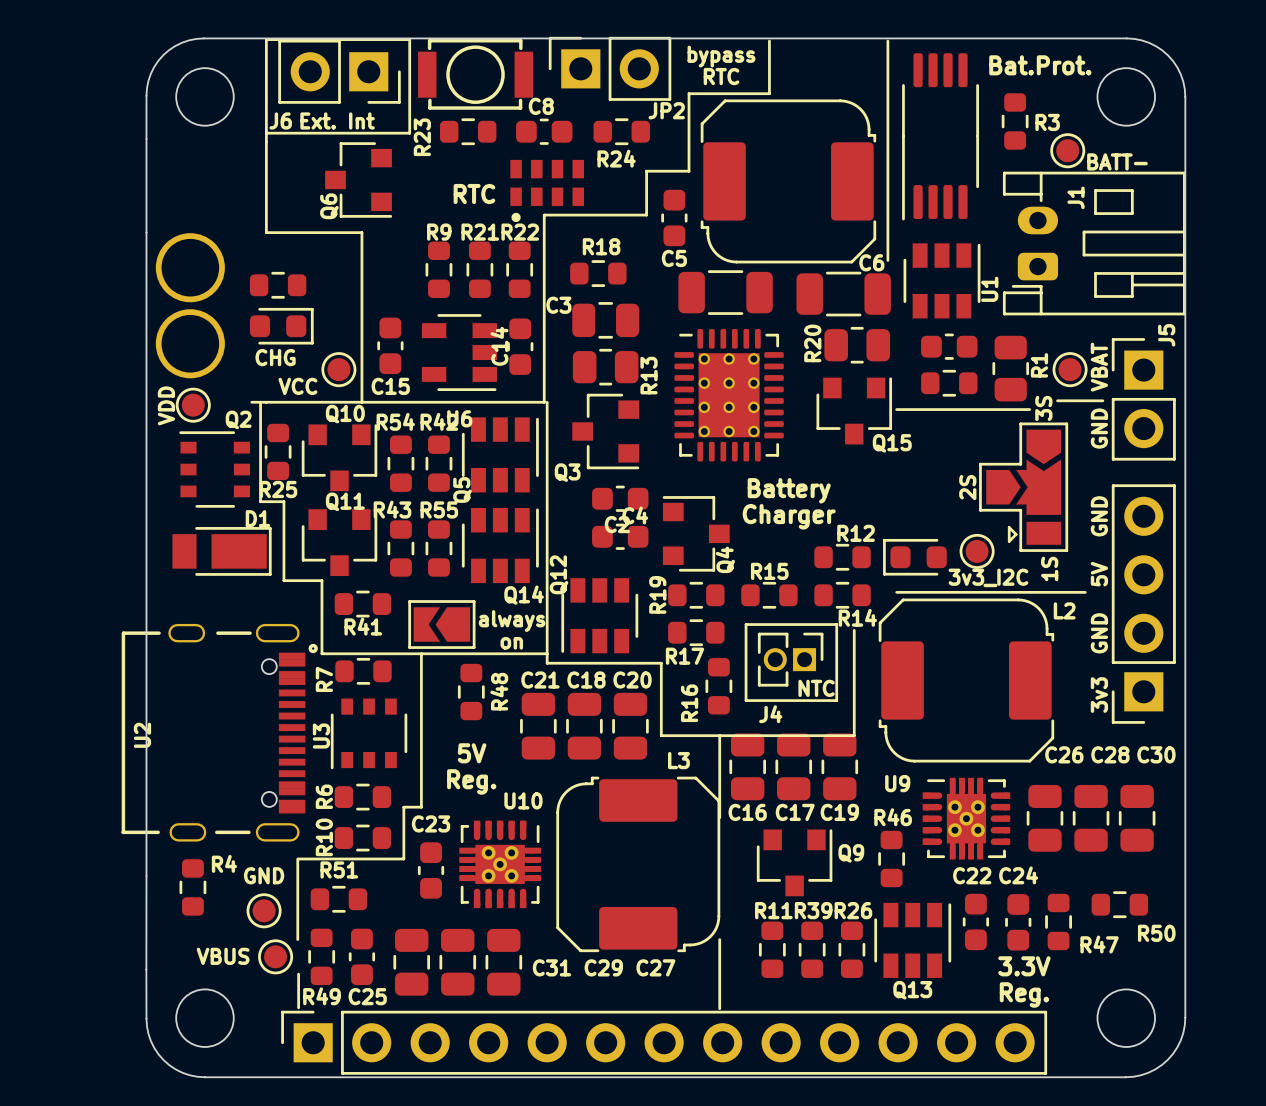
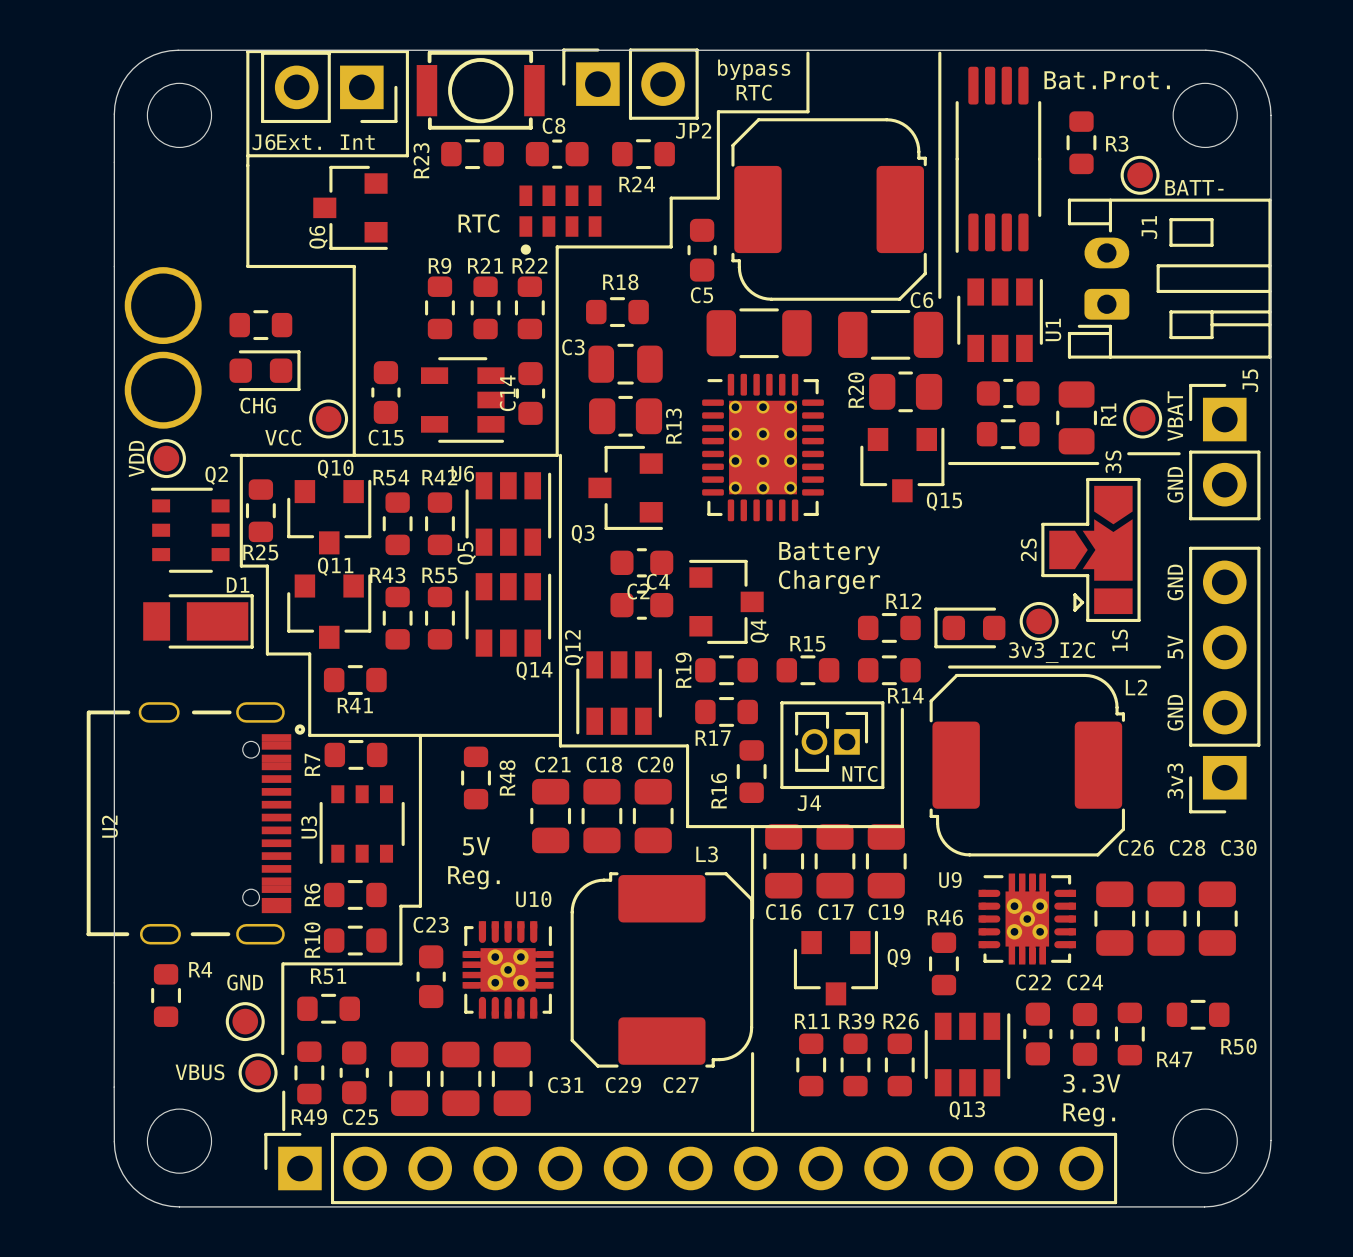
text: always (512, 621) -> none
part: (441, 624) -> none
text: on (511, 643) -> none

